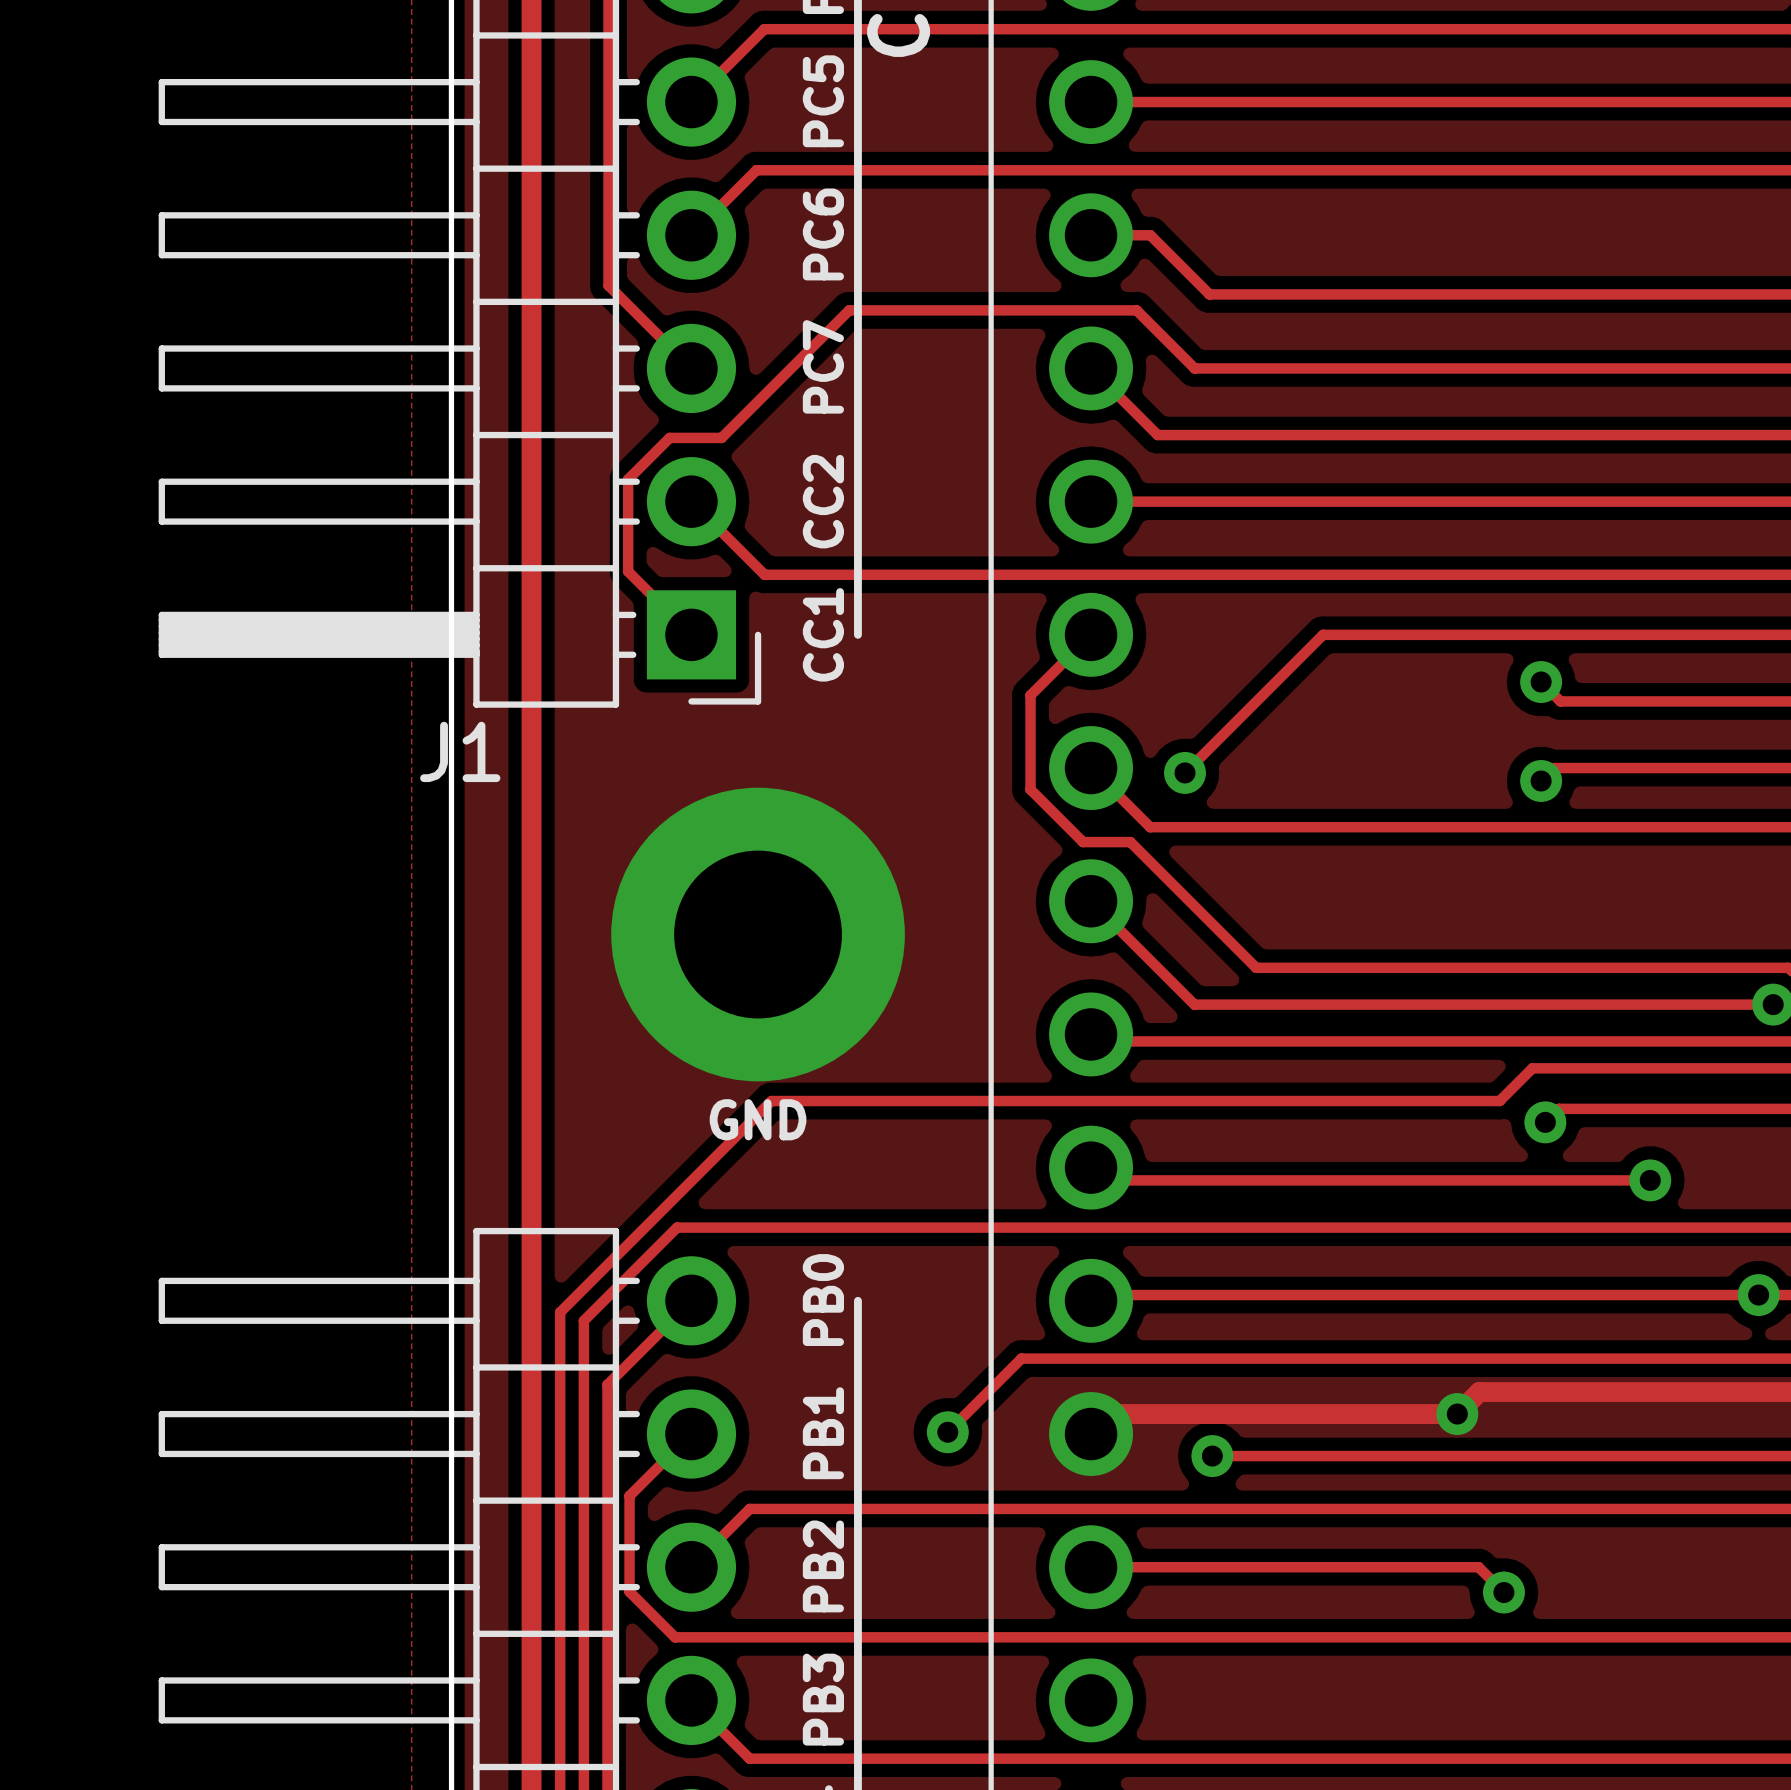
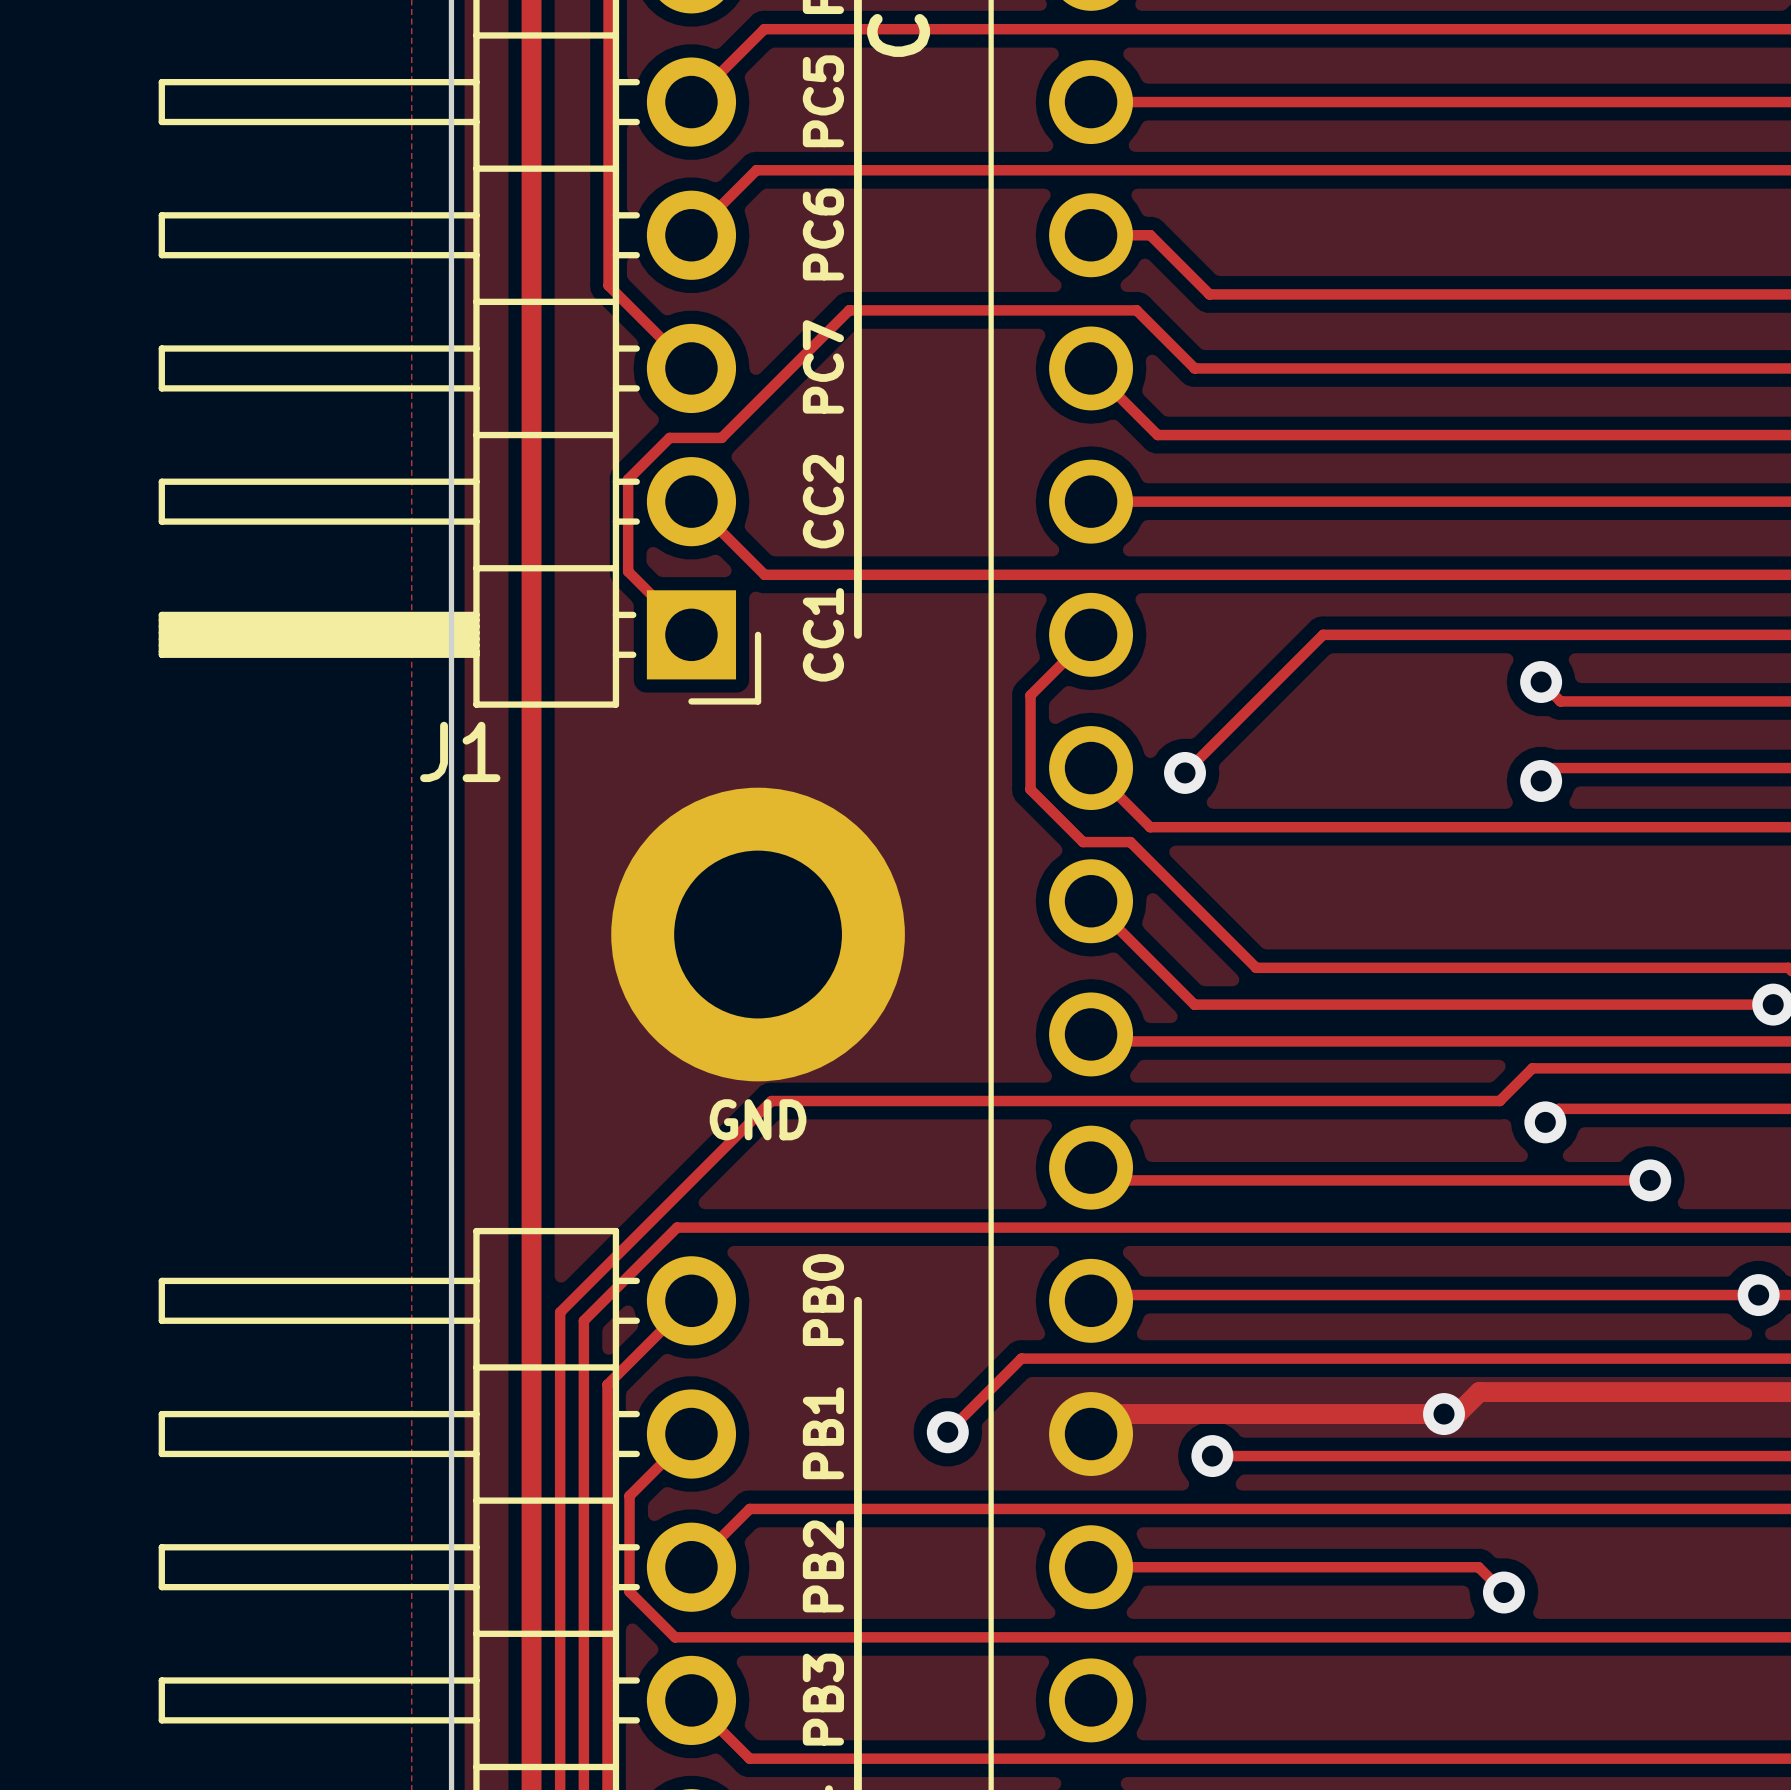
via position: (1457, 1414) -> (1444, 1414)

